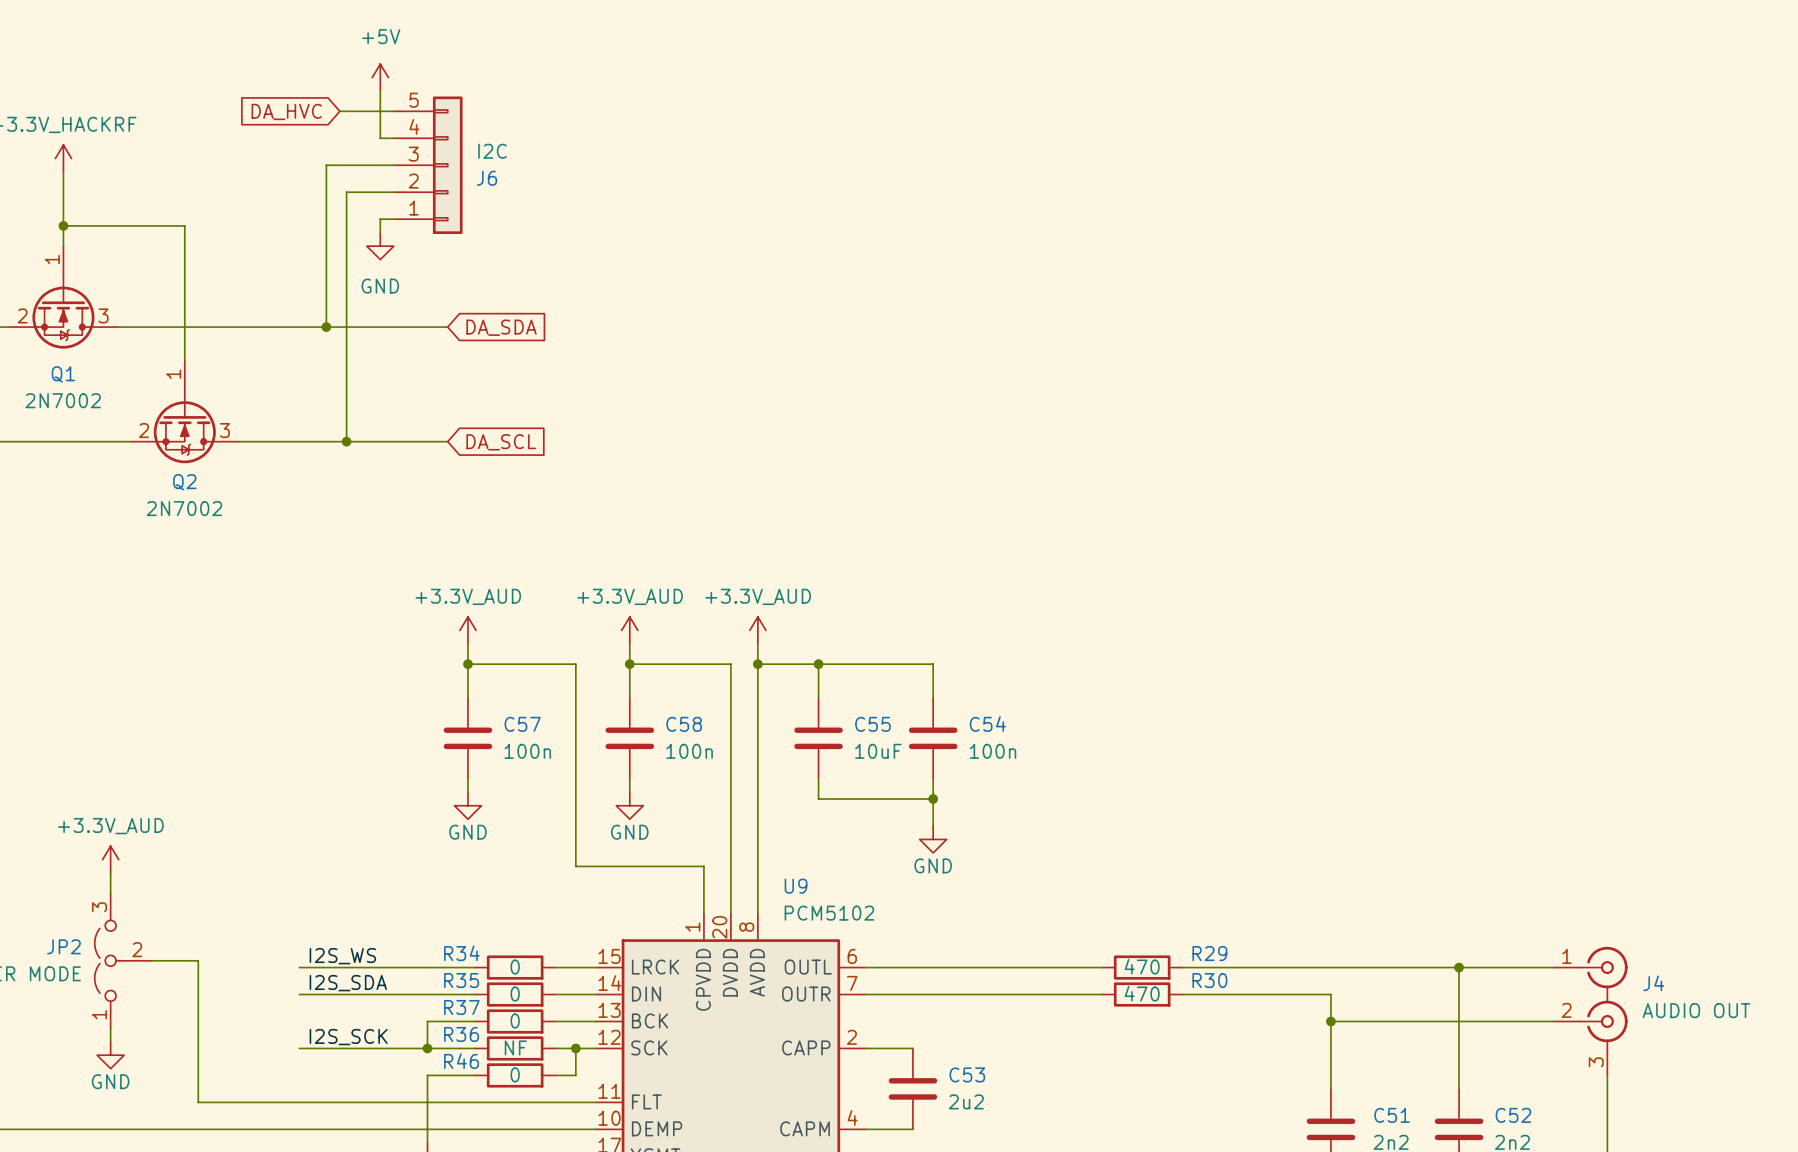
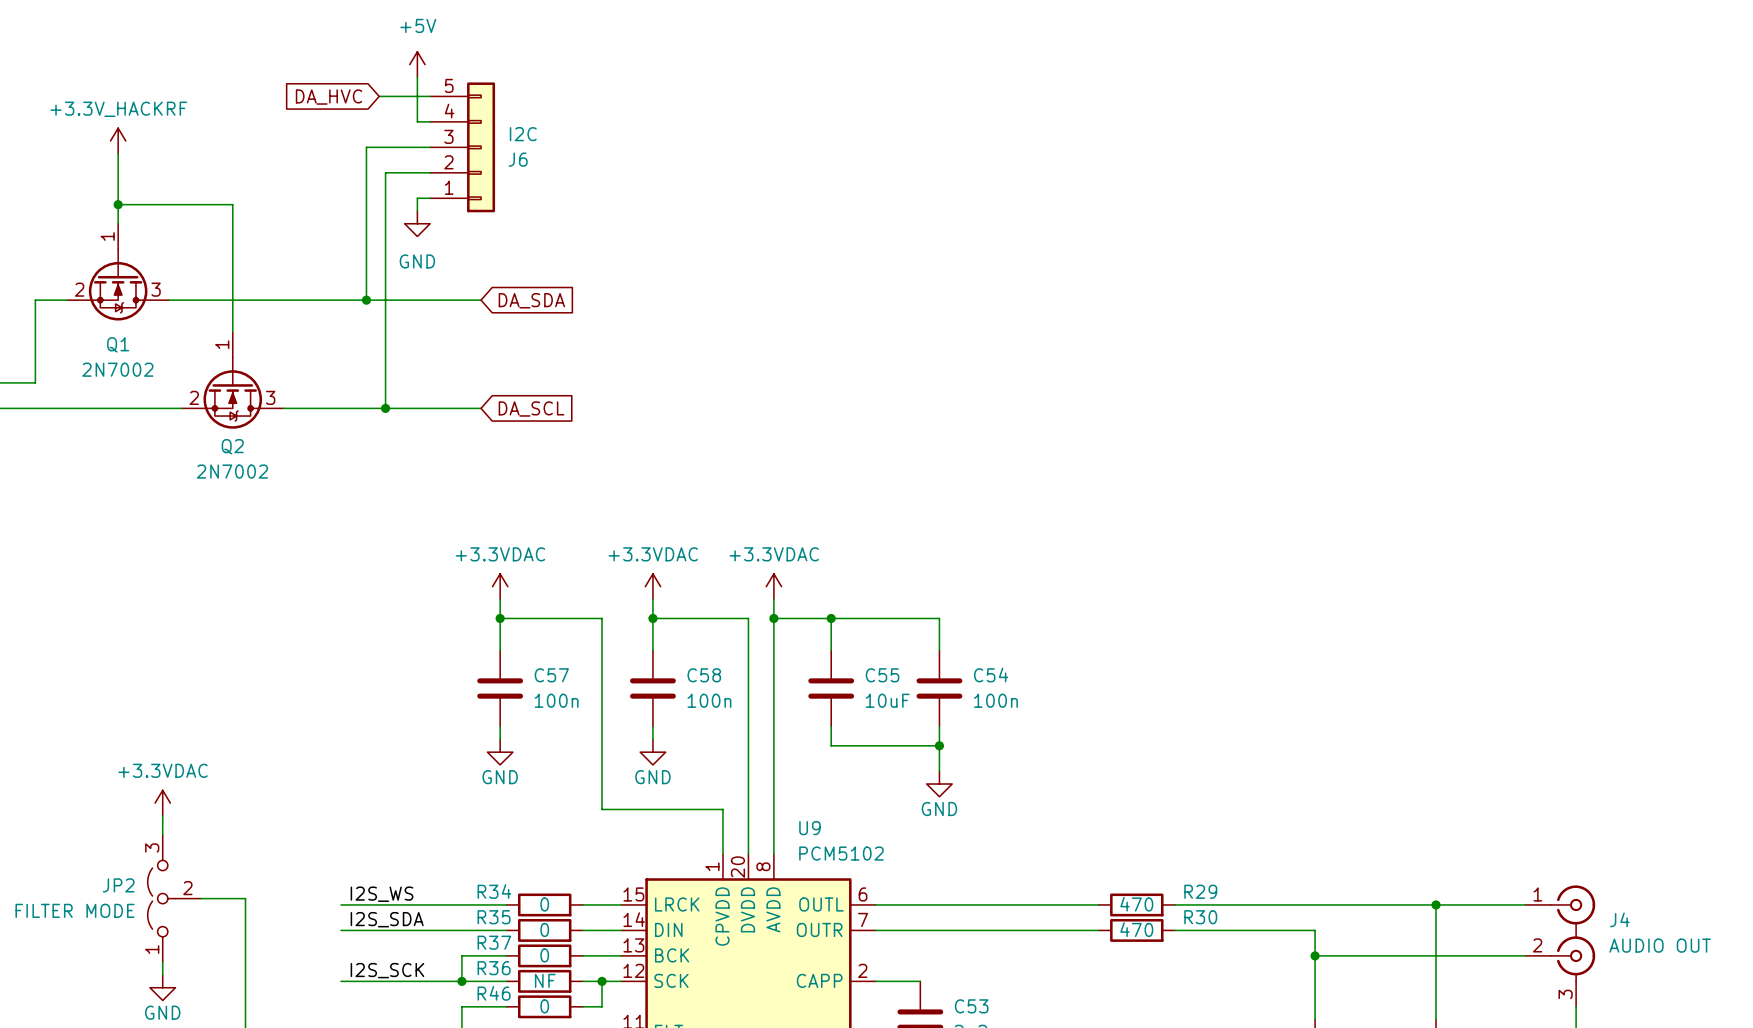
power symbol: +3.3V_AUD (467, 630) -> +3.3VDAC (500, 586)
power symbol: +3.3V_AUD (629, 630) -> +3.3VDAC (652, 586)
power symbol: +3.3V_AUD (757, 630) -> +3.3VDAC (773, 586)
power symbol: +3.3V_AUD (110, 859) -> +3.3VDAC (162, 803)

